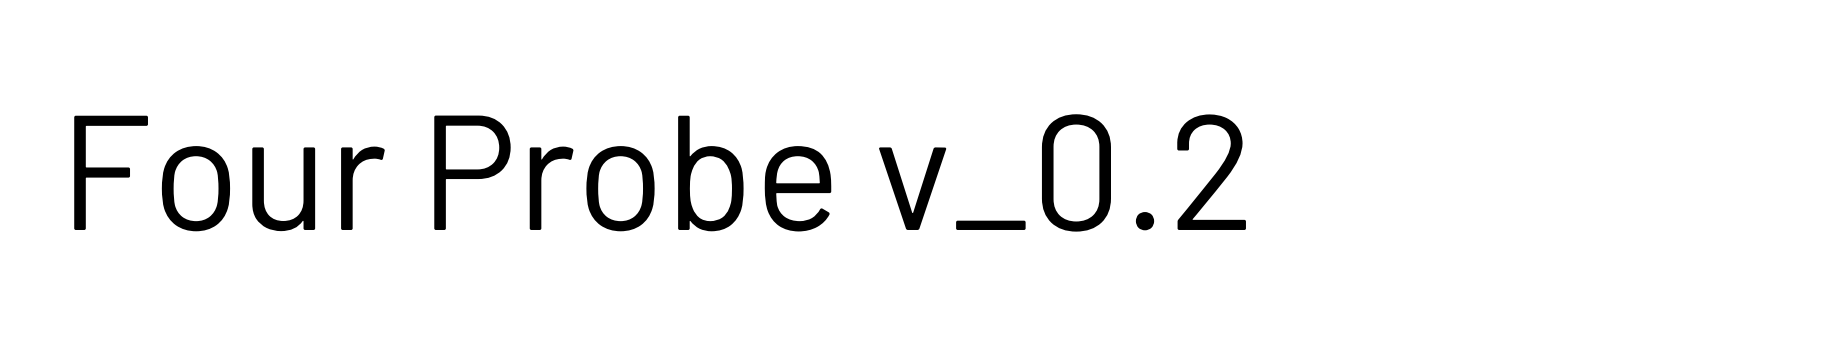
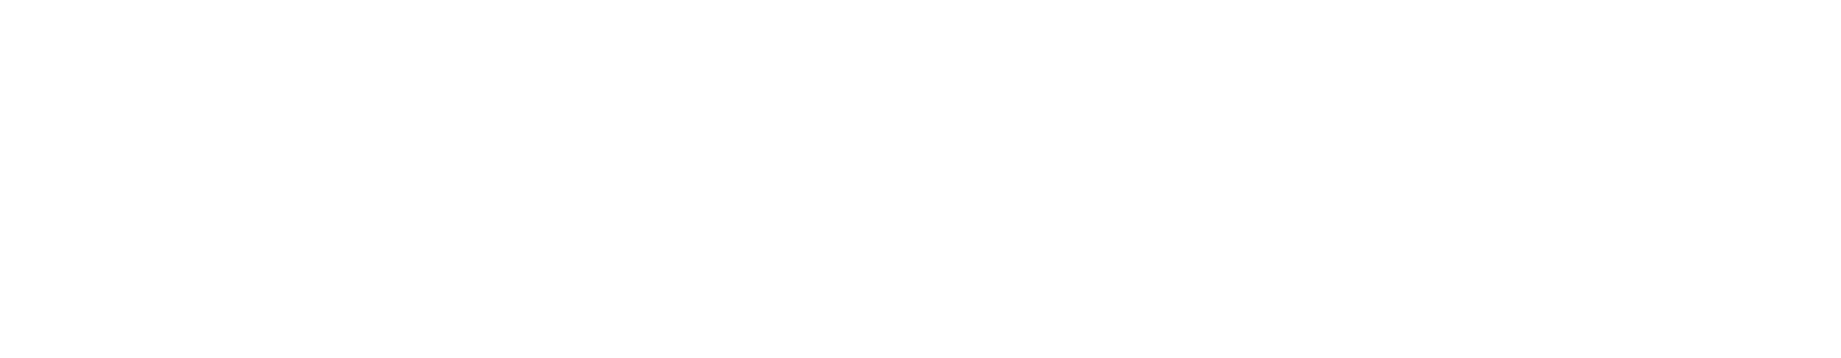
text: Four Probe v_0.2 (660, 172) -> none

